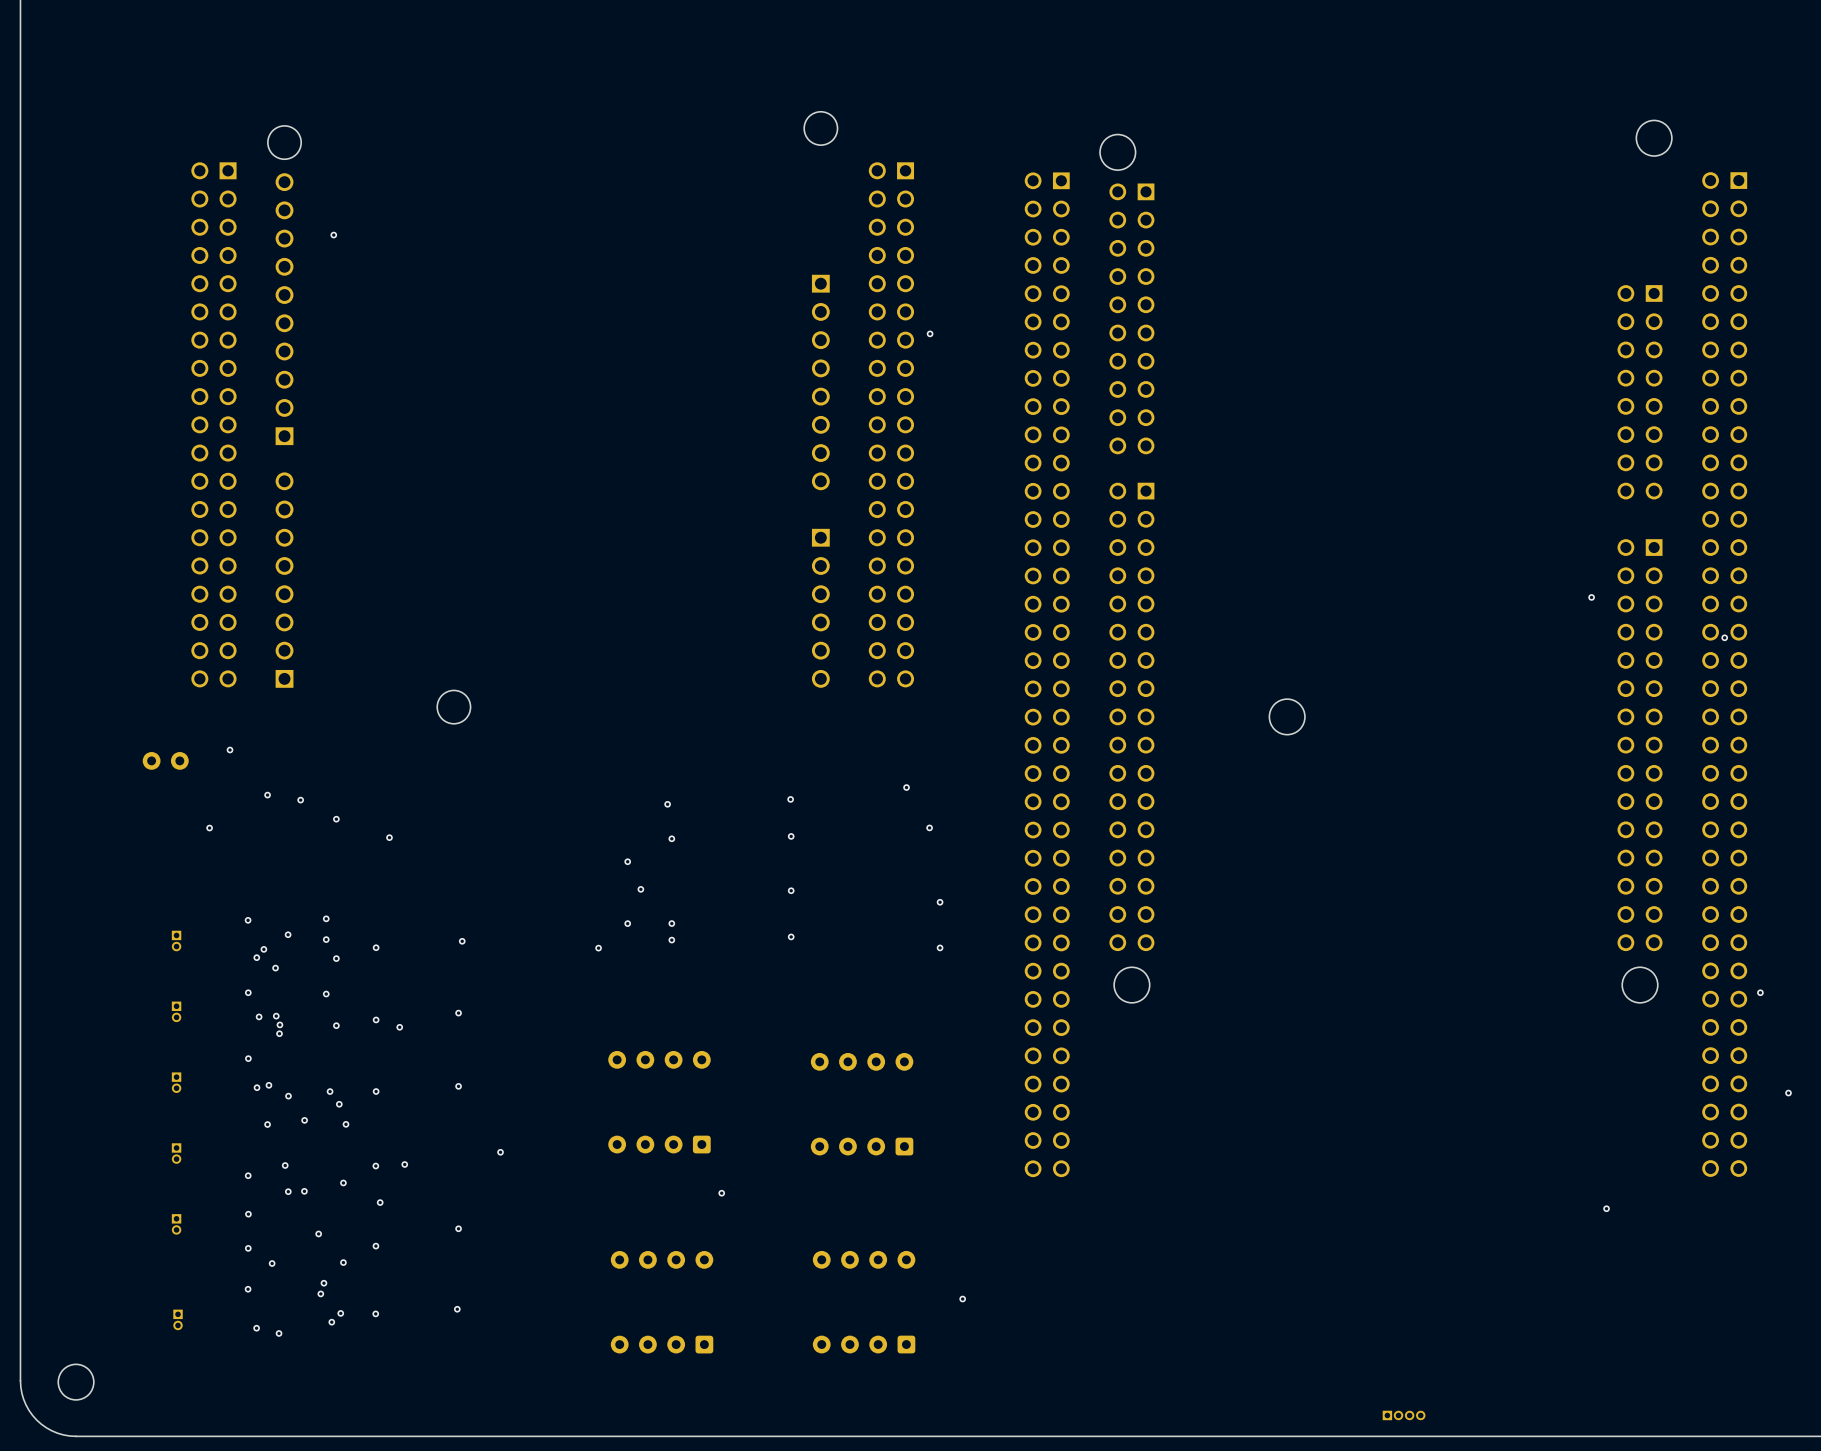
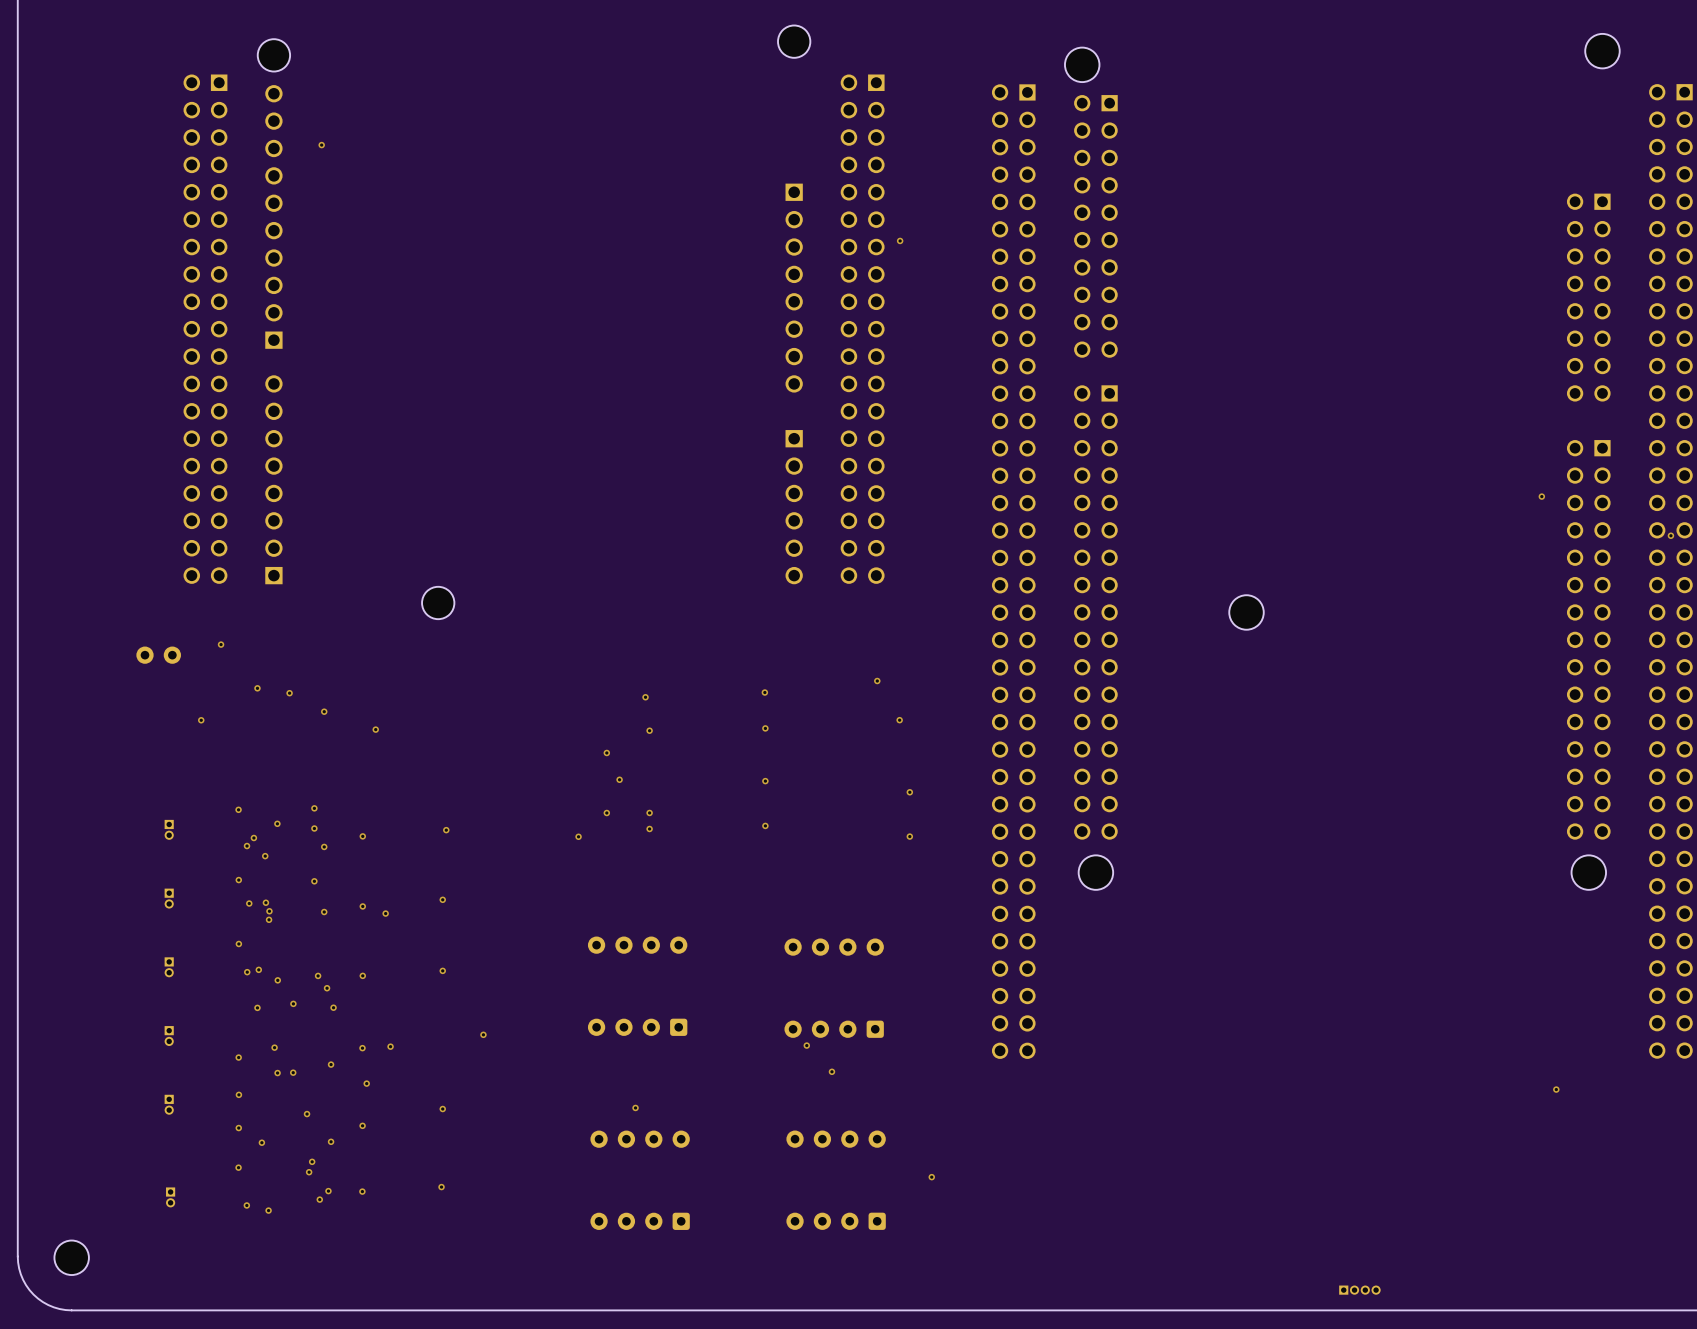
via: none -> (806, 1045)
via: none -> (831, 1071)
via: (721, 1193) -> none
via: none -> (635, 1107)

